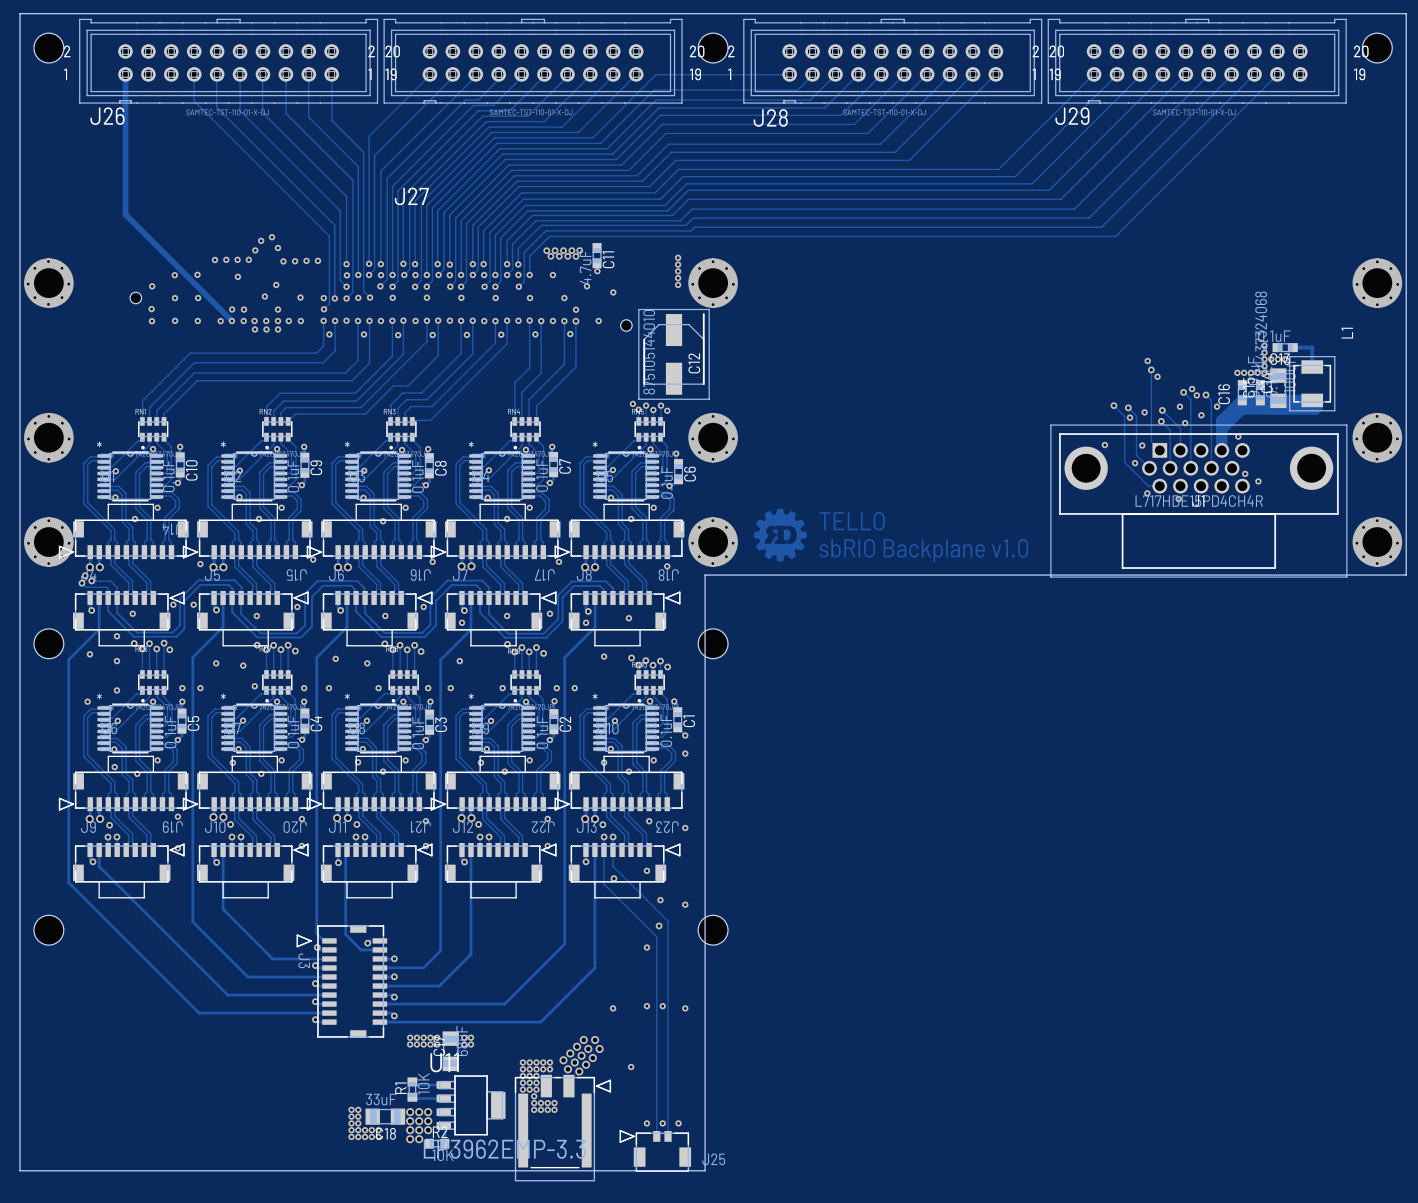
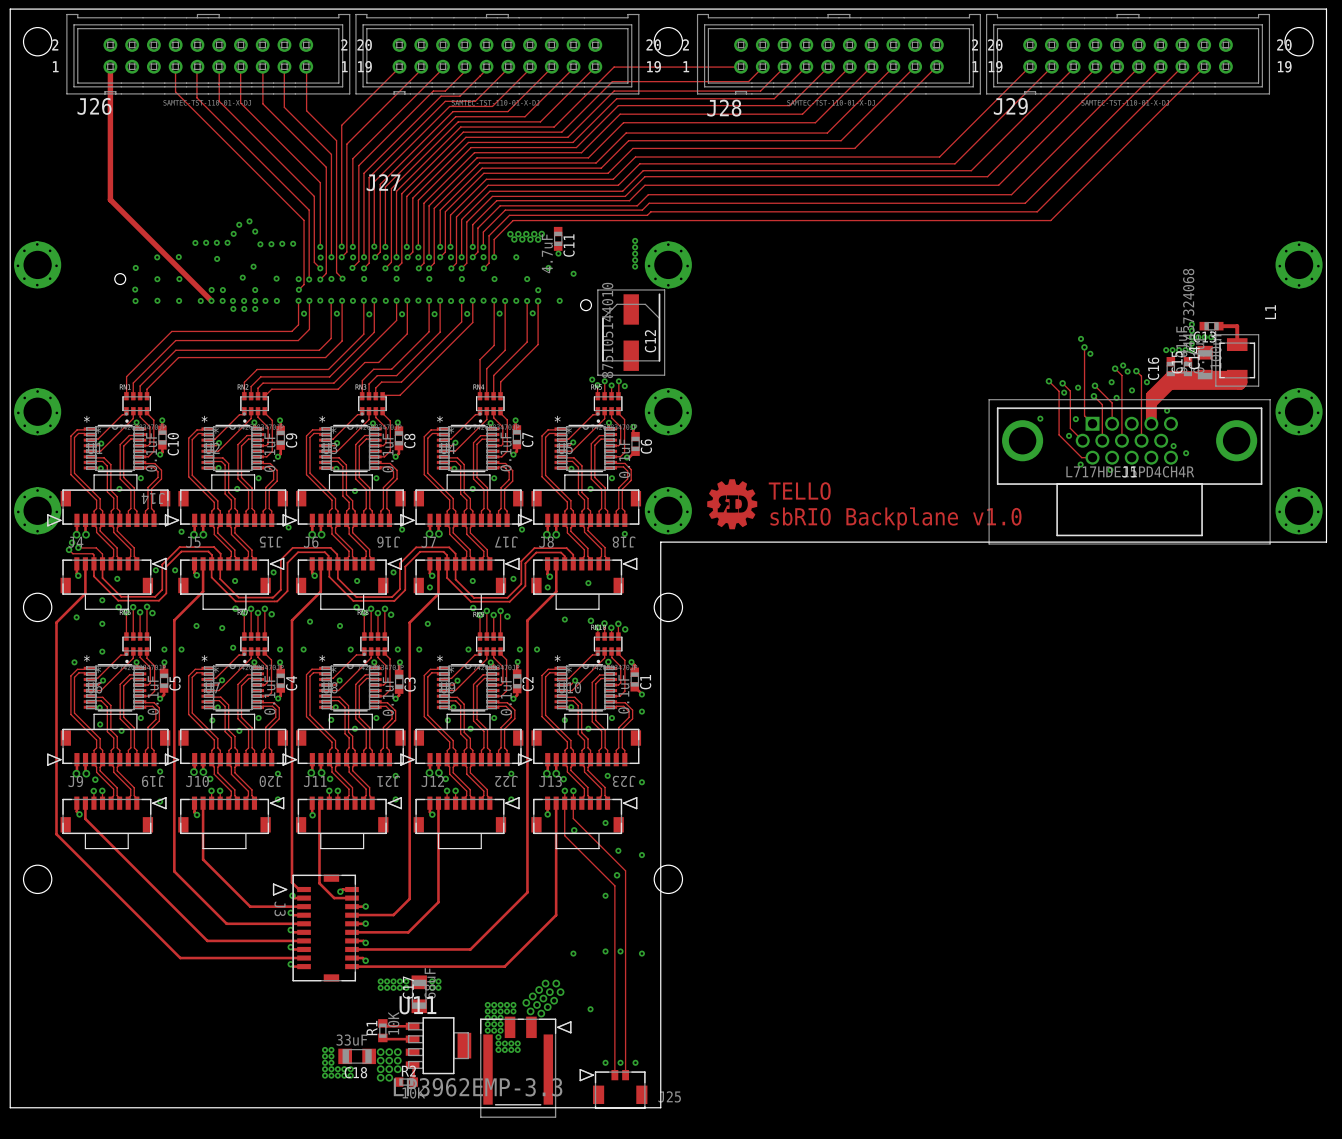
C13 value: 0.1uF (1274, 336) -> none

